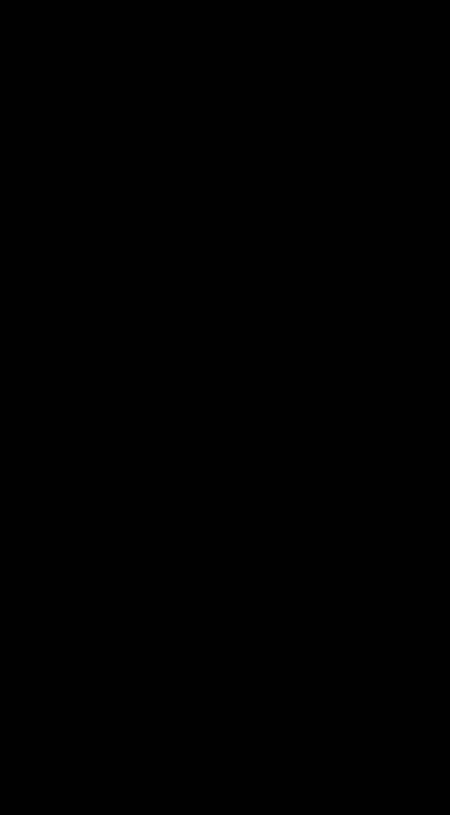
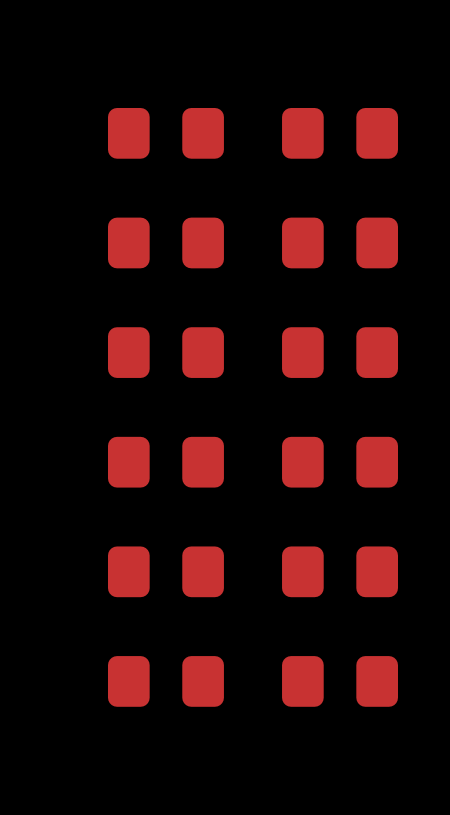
part: none -> (165, 133)
part: none -> (340, 133)
part: none -> (165, 242)
part: none -> (340, 242)
part: none -> (165, 352)
part: none -> (340, 352)
part: none -> (165, 462)
part: none -> (340, 462)
part: none -> (165, 571)
part: none -> (340, 571)
part: none -> (165, 681)
part: none -> (340, 681)

